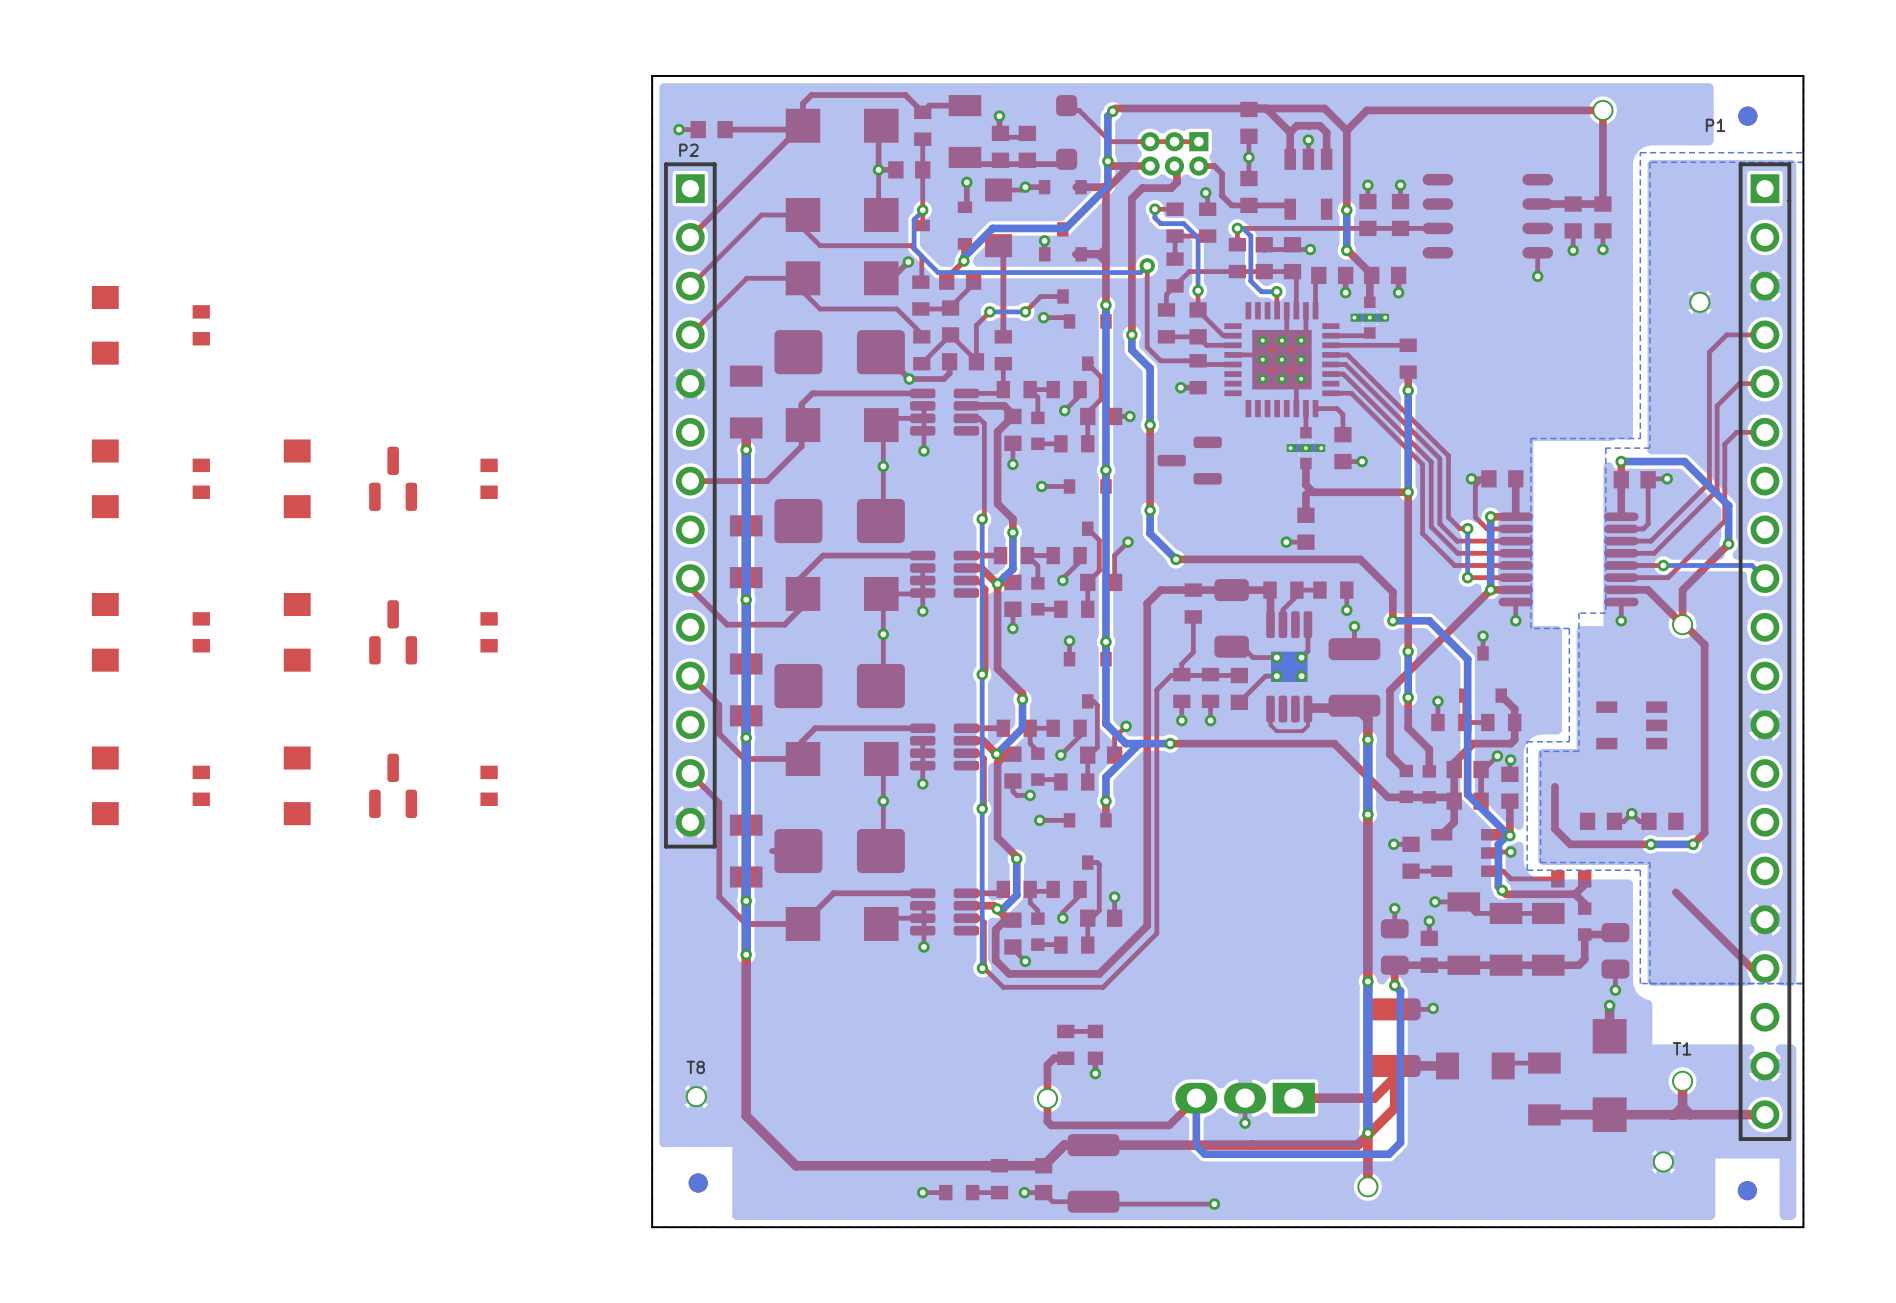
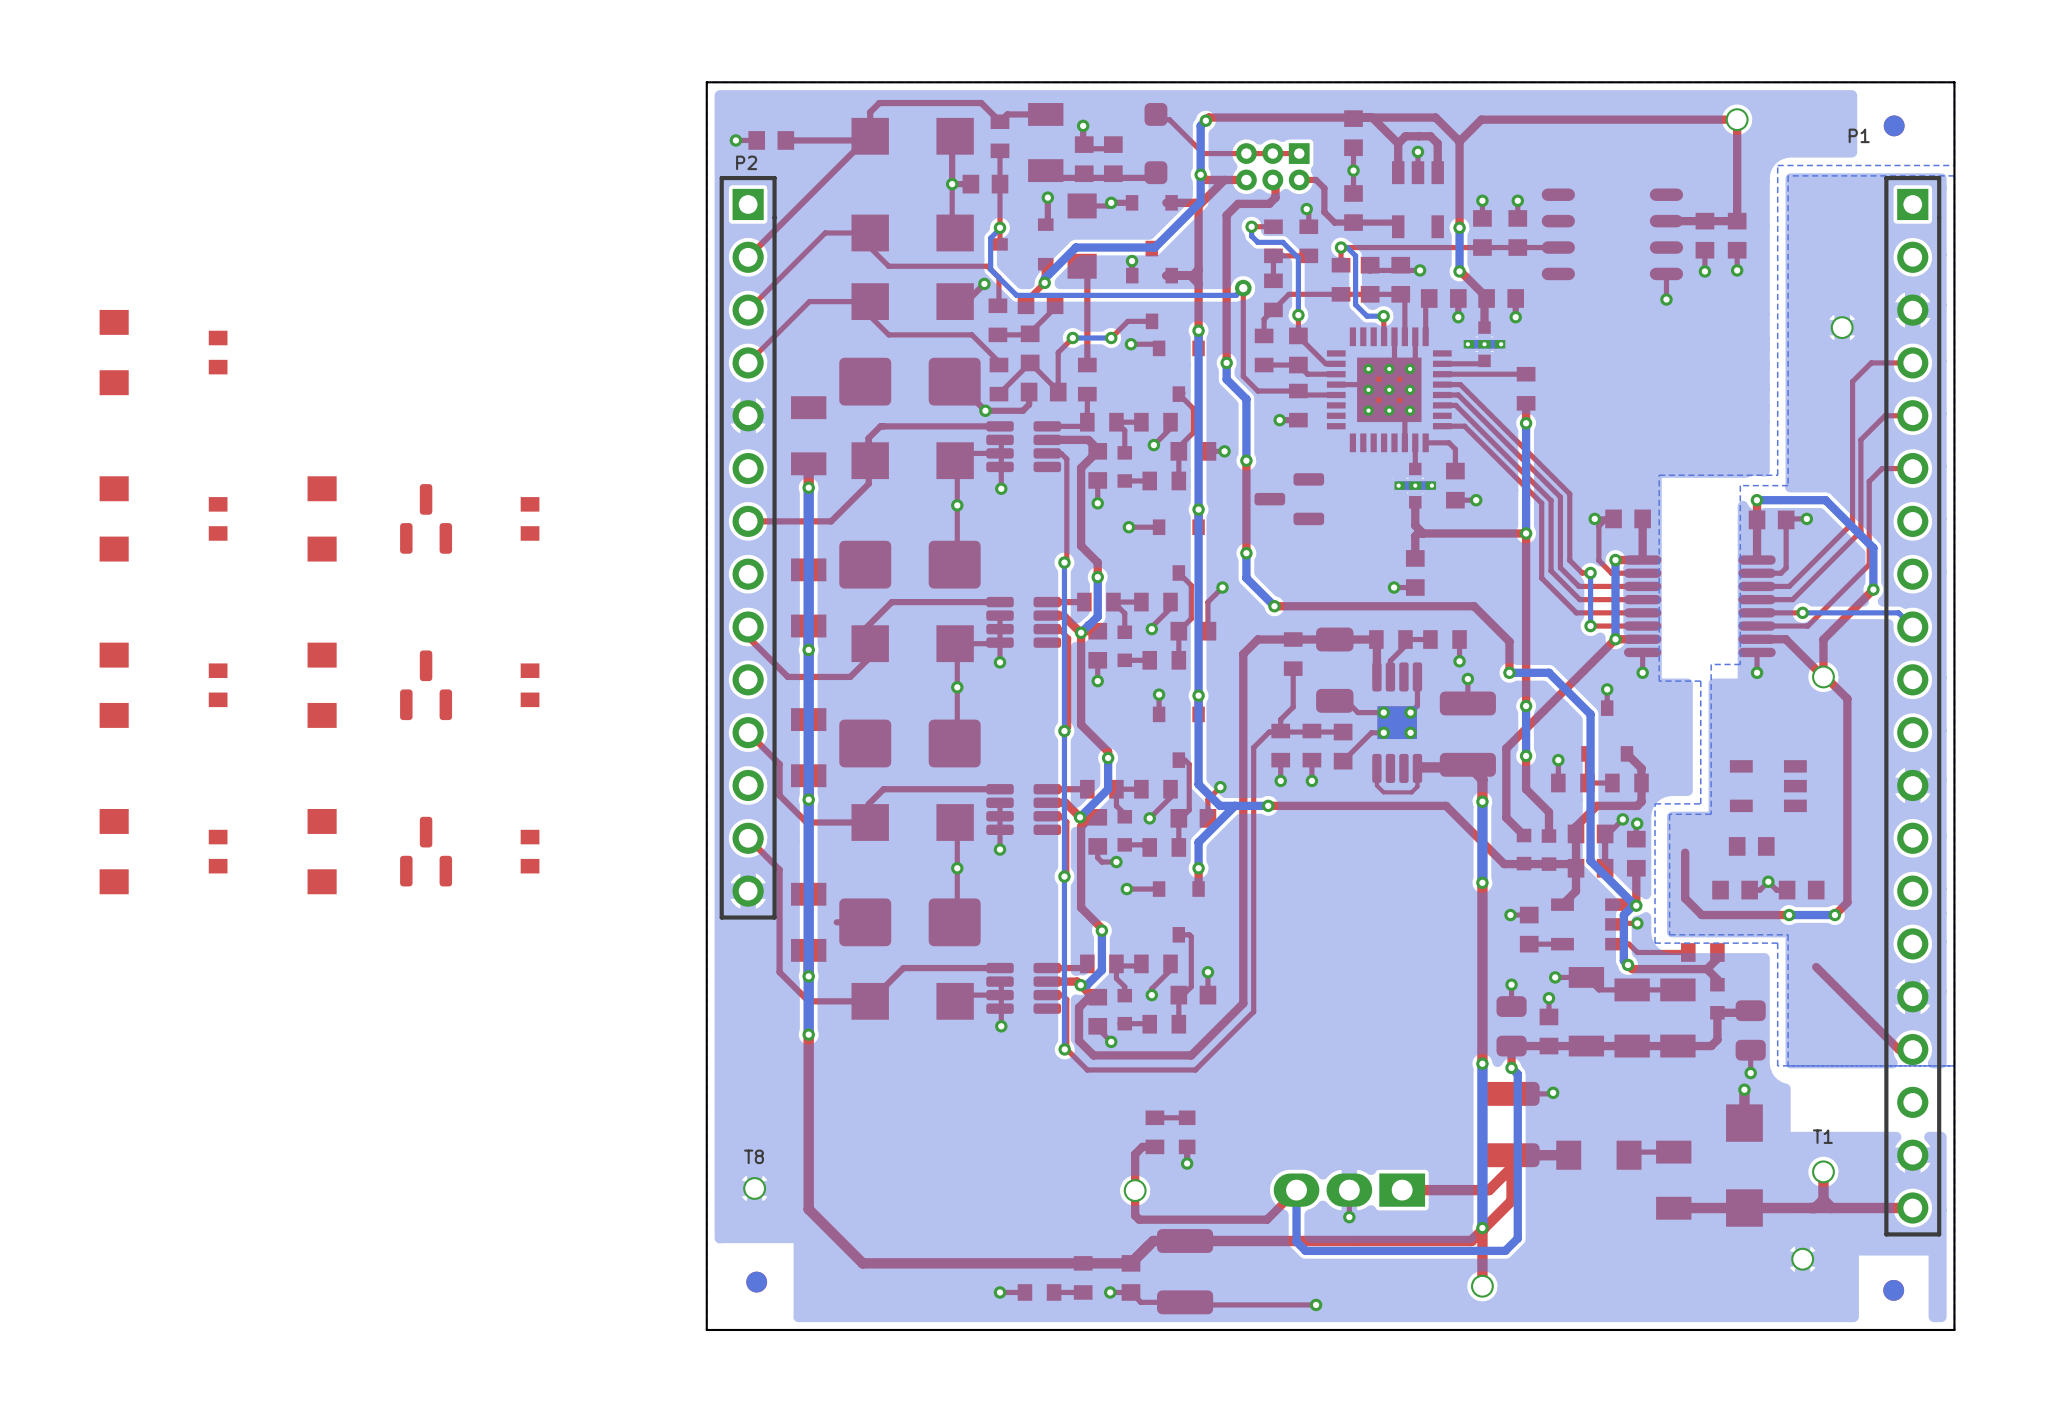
part: none -> (1751, 846)

